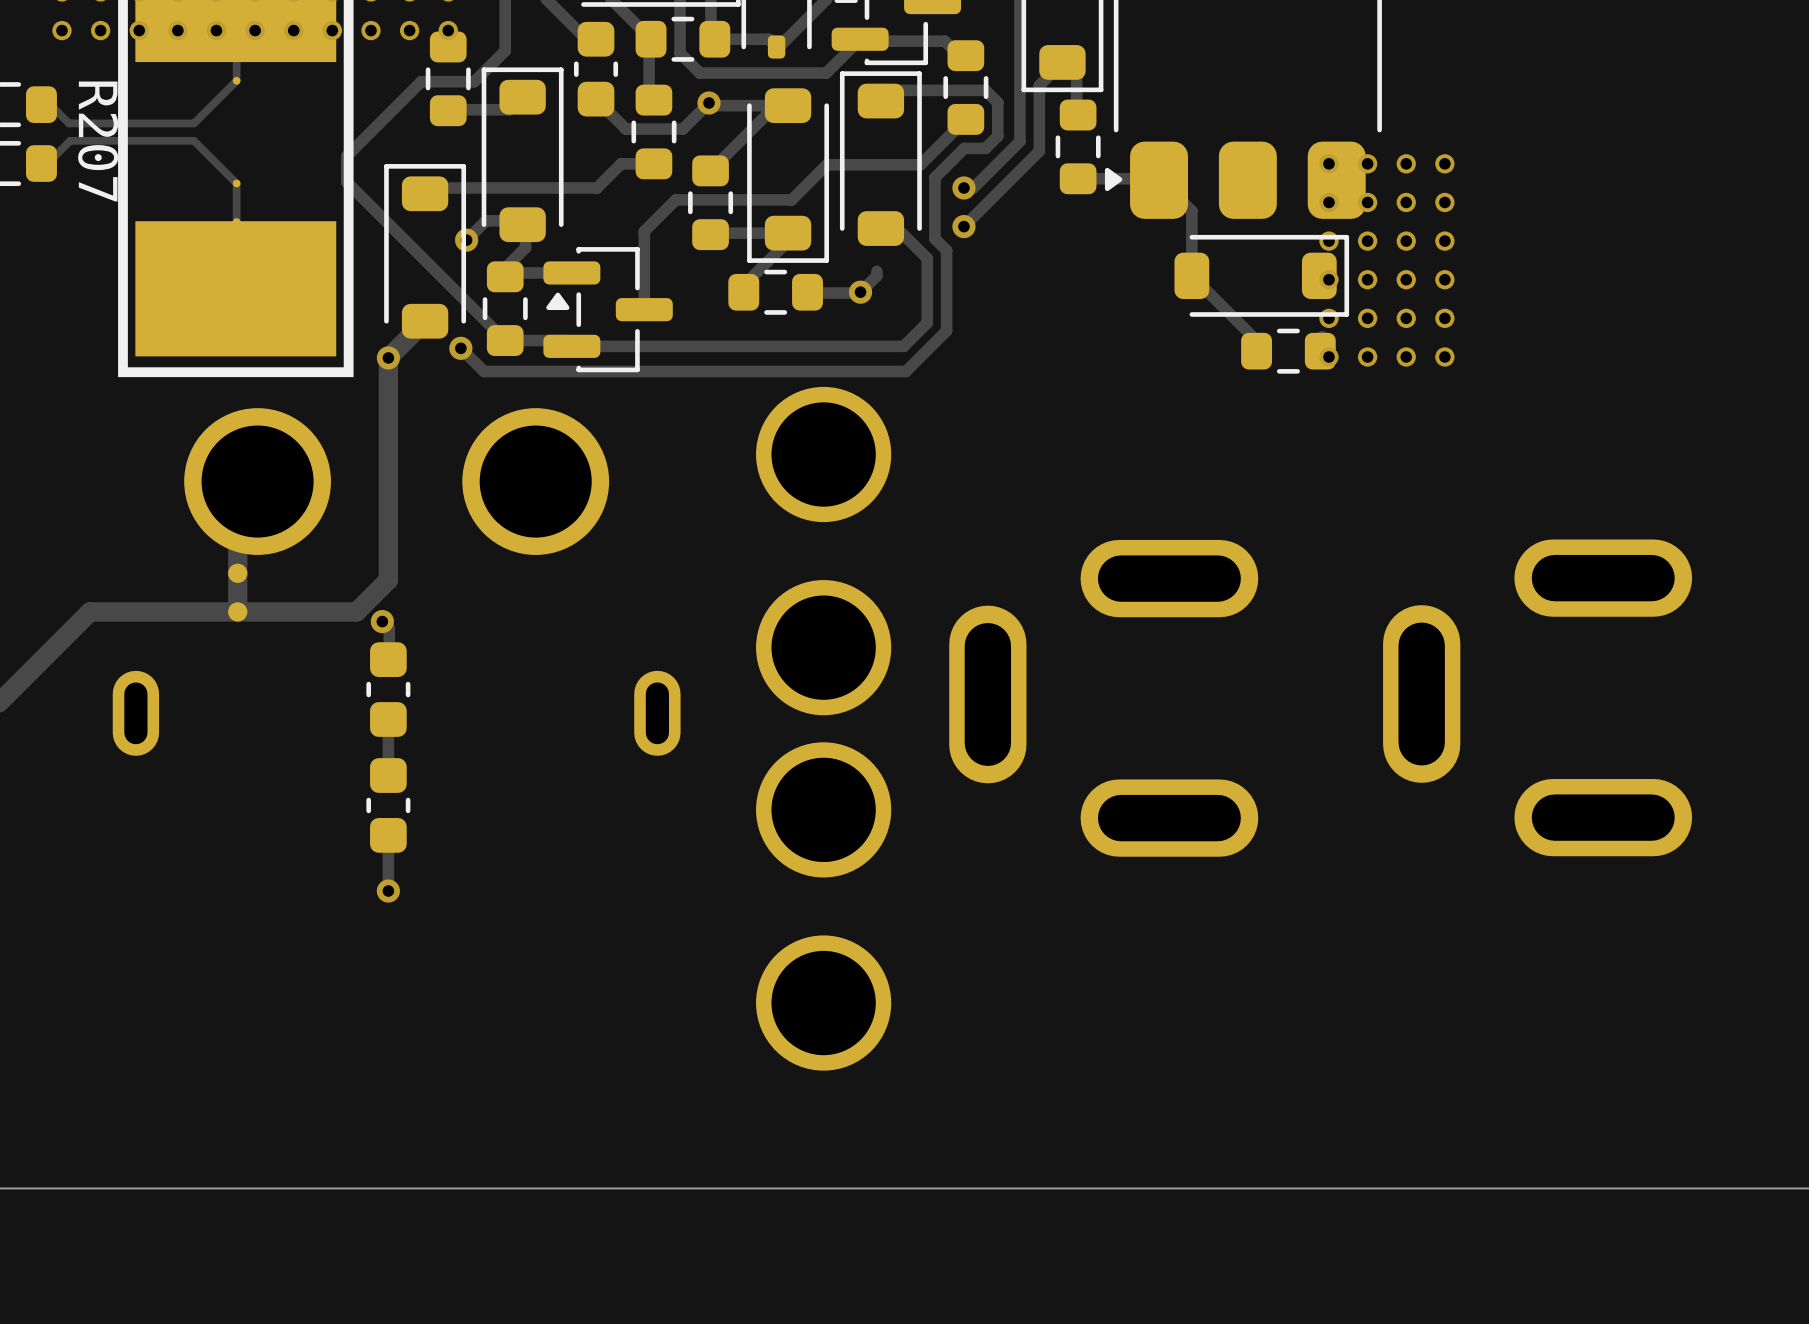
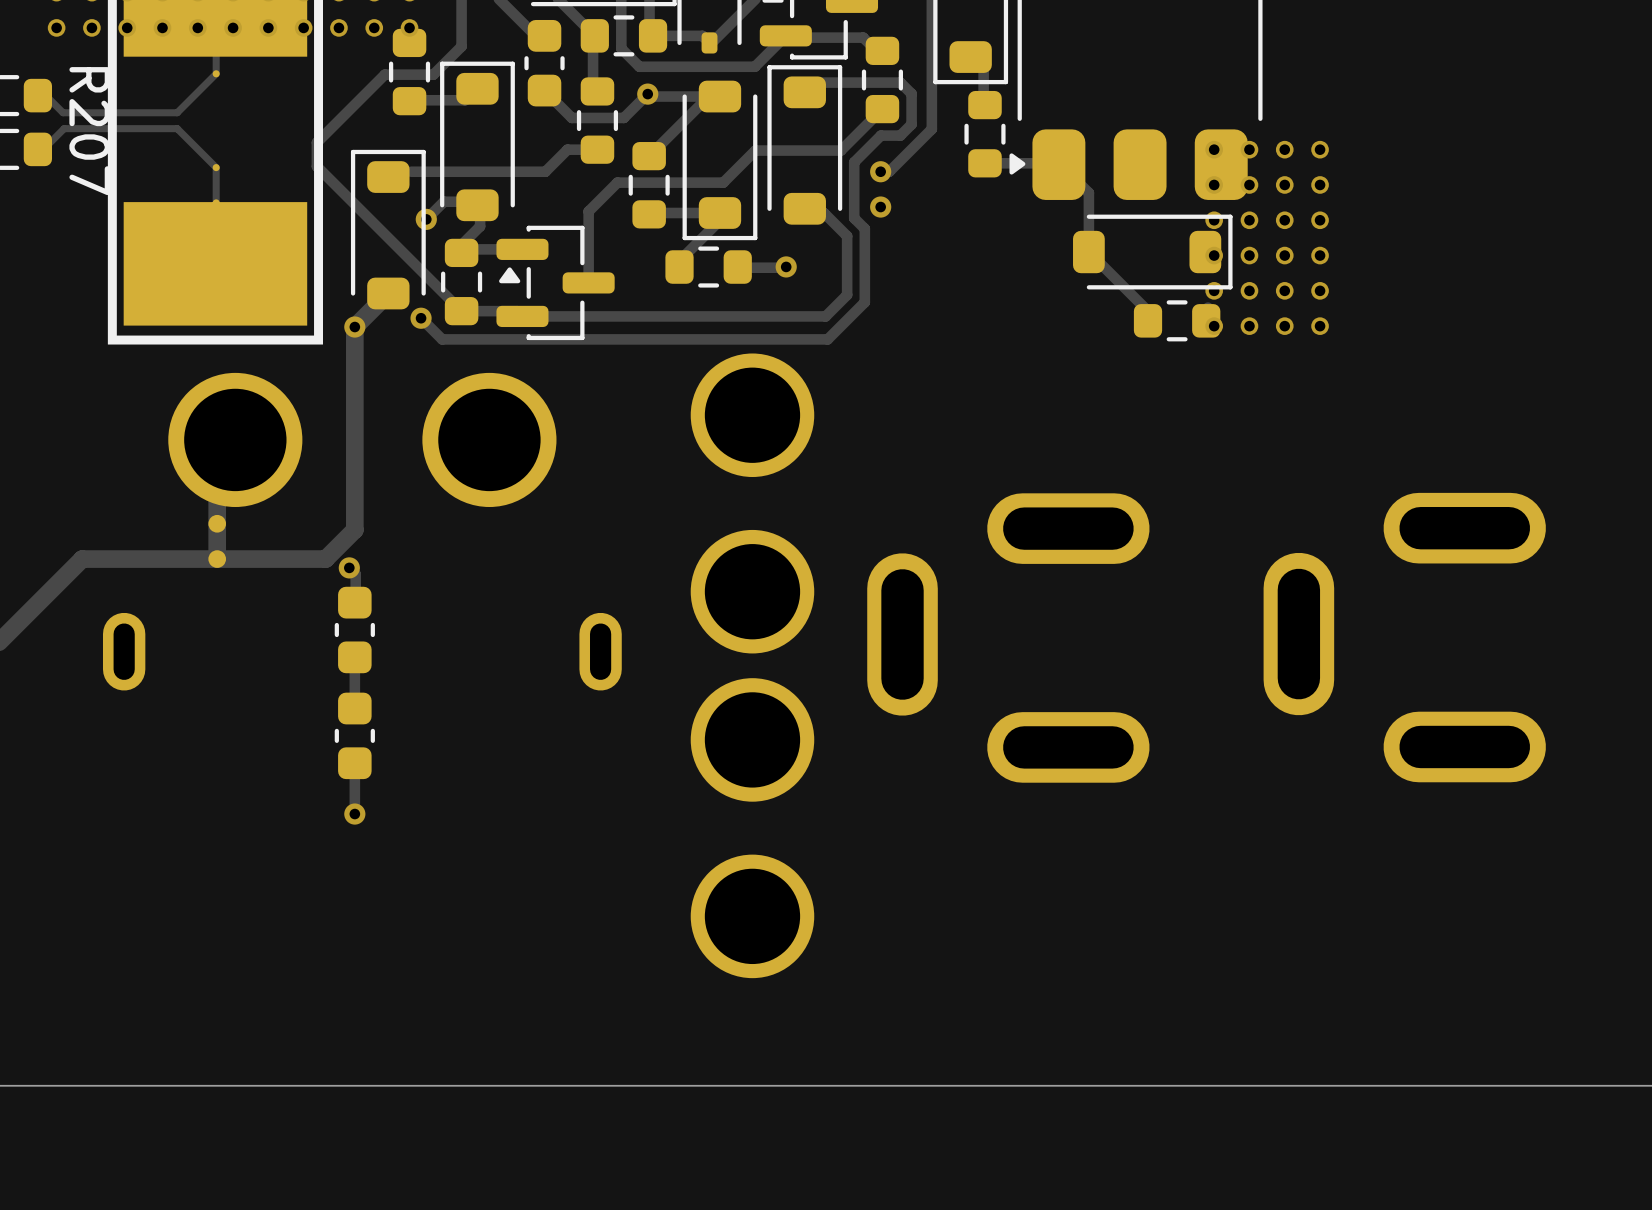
track: (1062, 62) (1039, 85) (1039, 151) (963, 226) -> none
track: (876, 271) (876, 275) (860, 292) -> none

